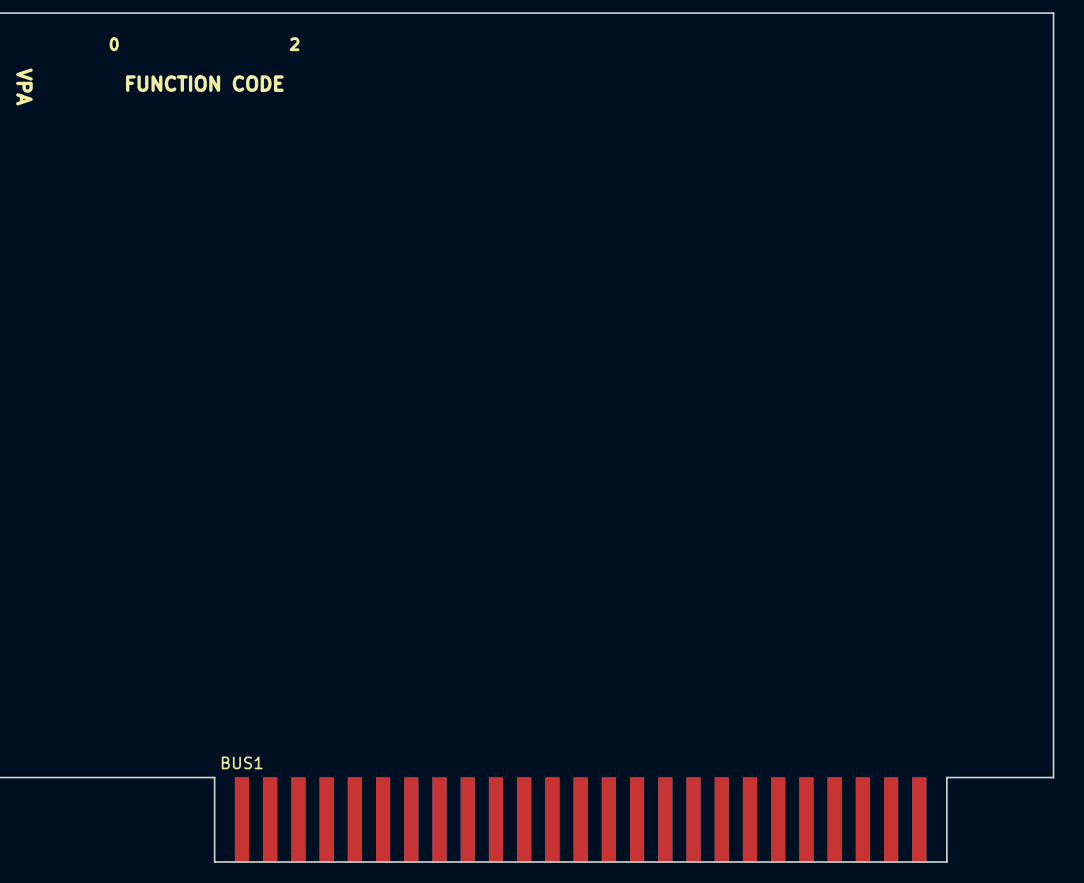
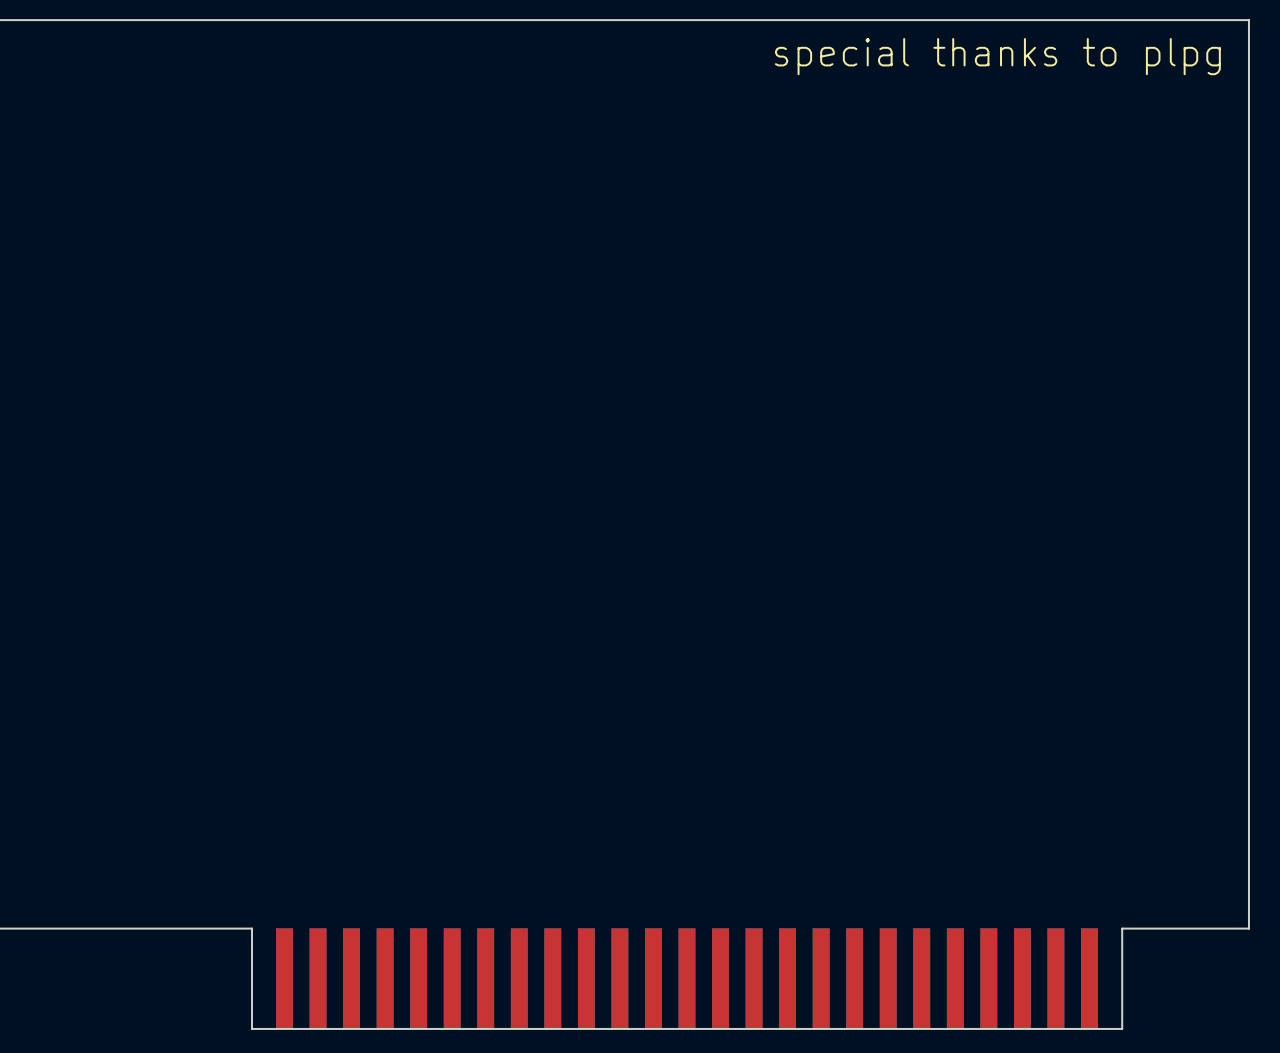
text: none -> special thanks to plpg (997, 56)
text: 0 (114, 44) -> none
text: 2 (294, 44) -> none
text: FUNCTION CODE (204, 83) -> none
text: VPA (24, 86) -> none
BUS1 name: BUS1 (242, 762) -> none

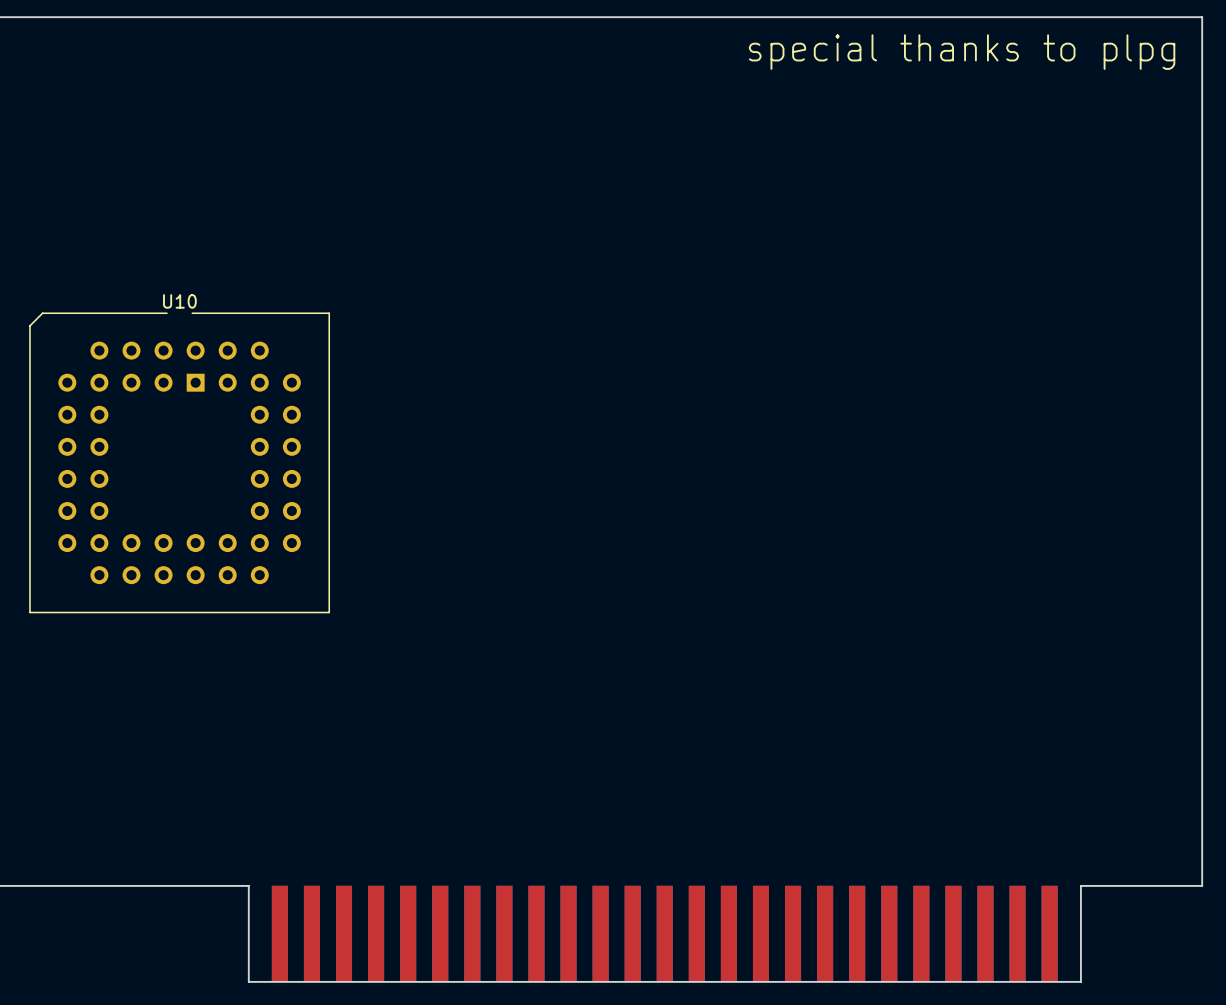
U10: none -> (179, 462)

